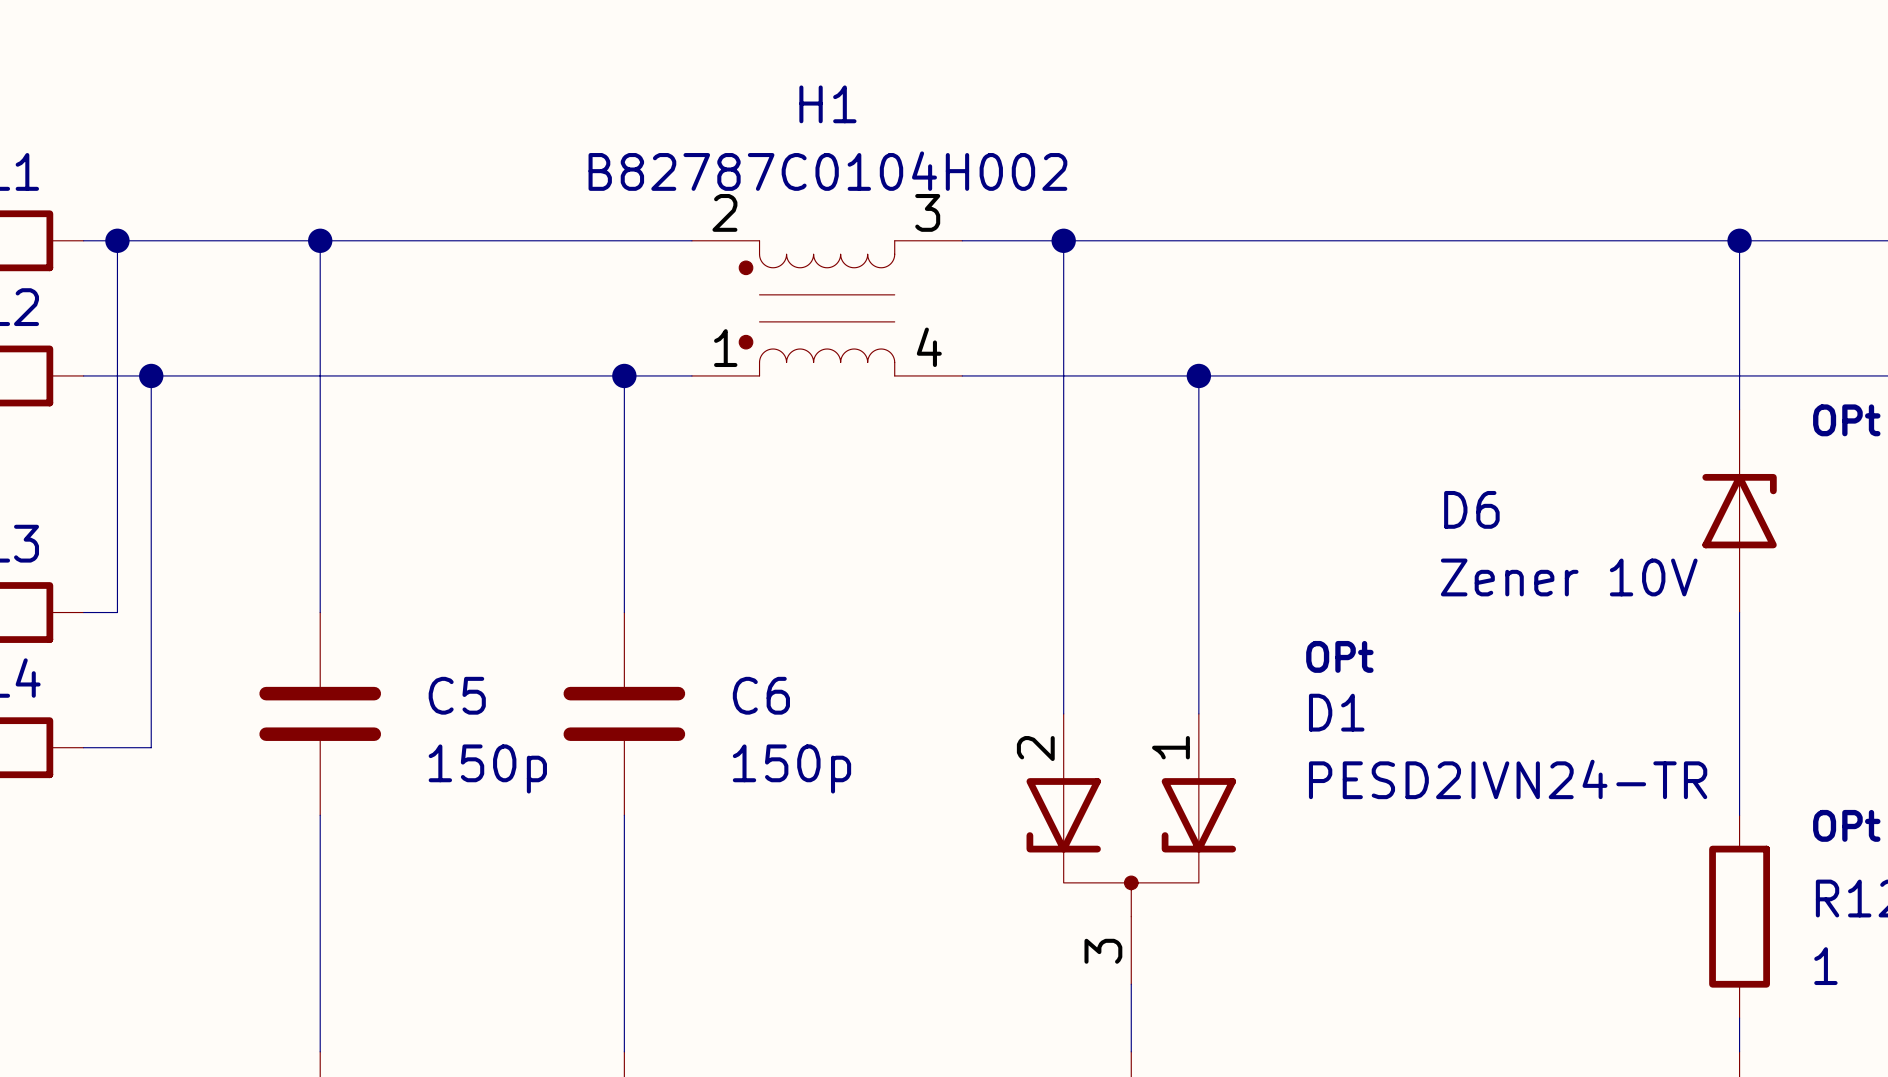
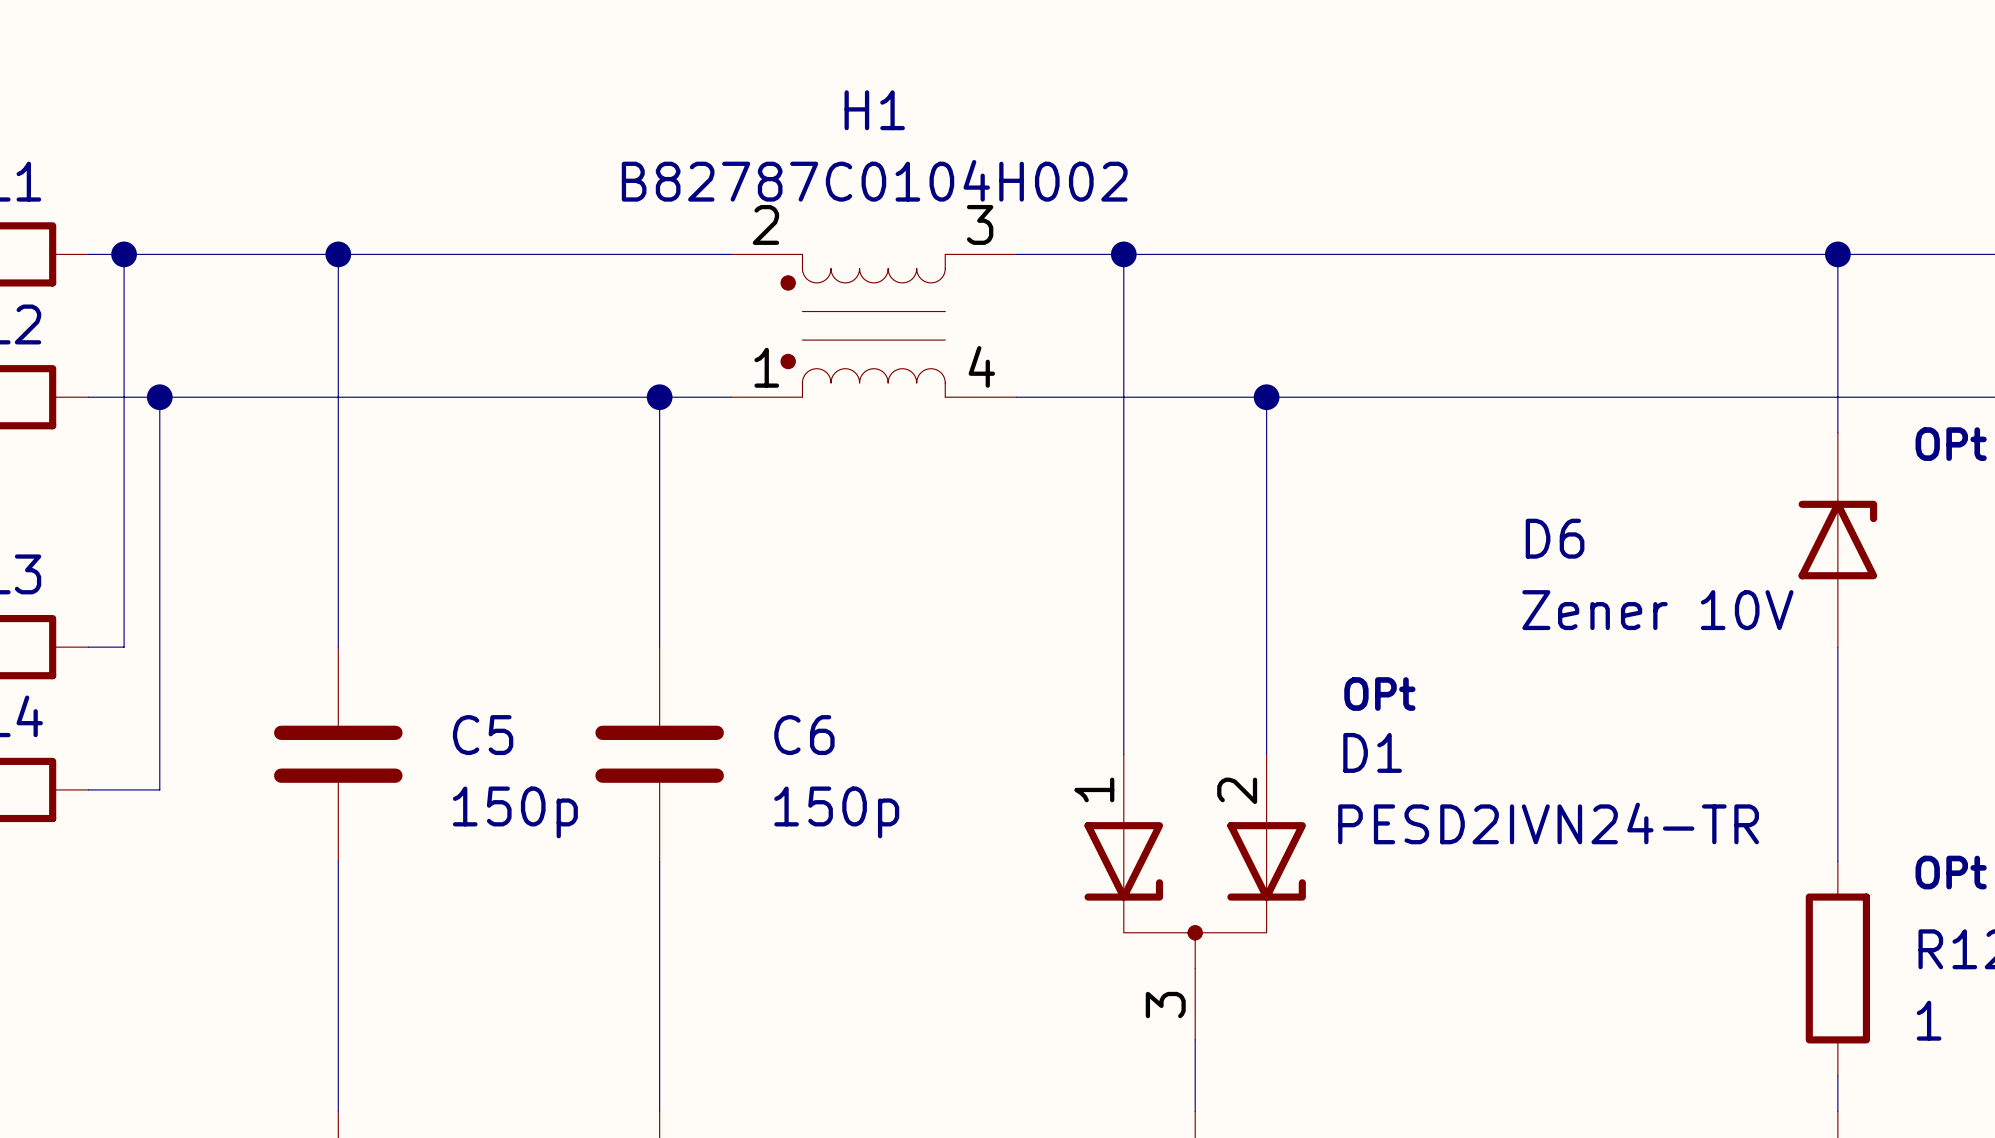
text position: OPt (1339, 656) -> OPt (1379, 694)
D1 value position: PESD2IVN24-TR (1508, 779) -> PESD2IVN24-TR (1548, 823)
D1 flip: as is (1131, 847) -> left-right (1195, 895)

